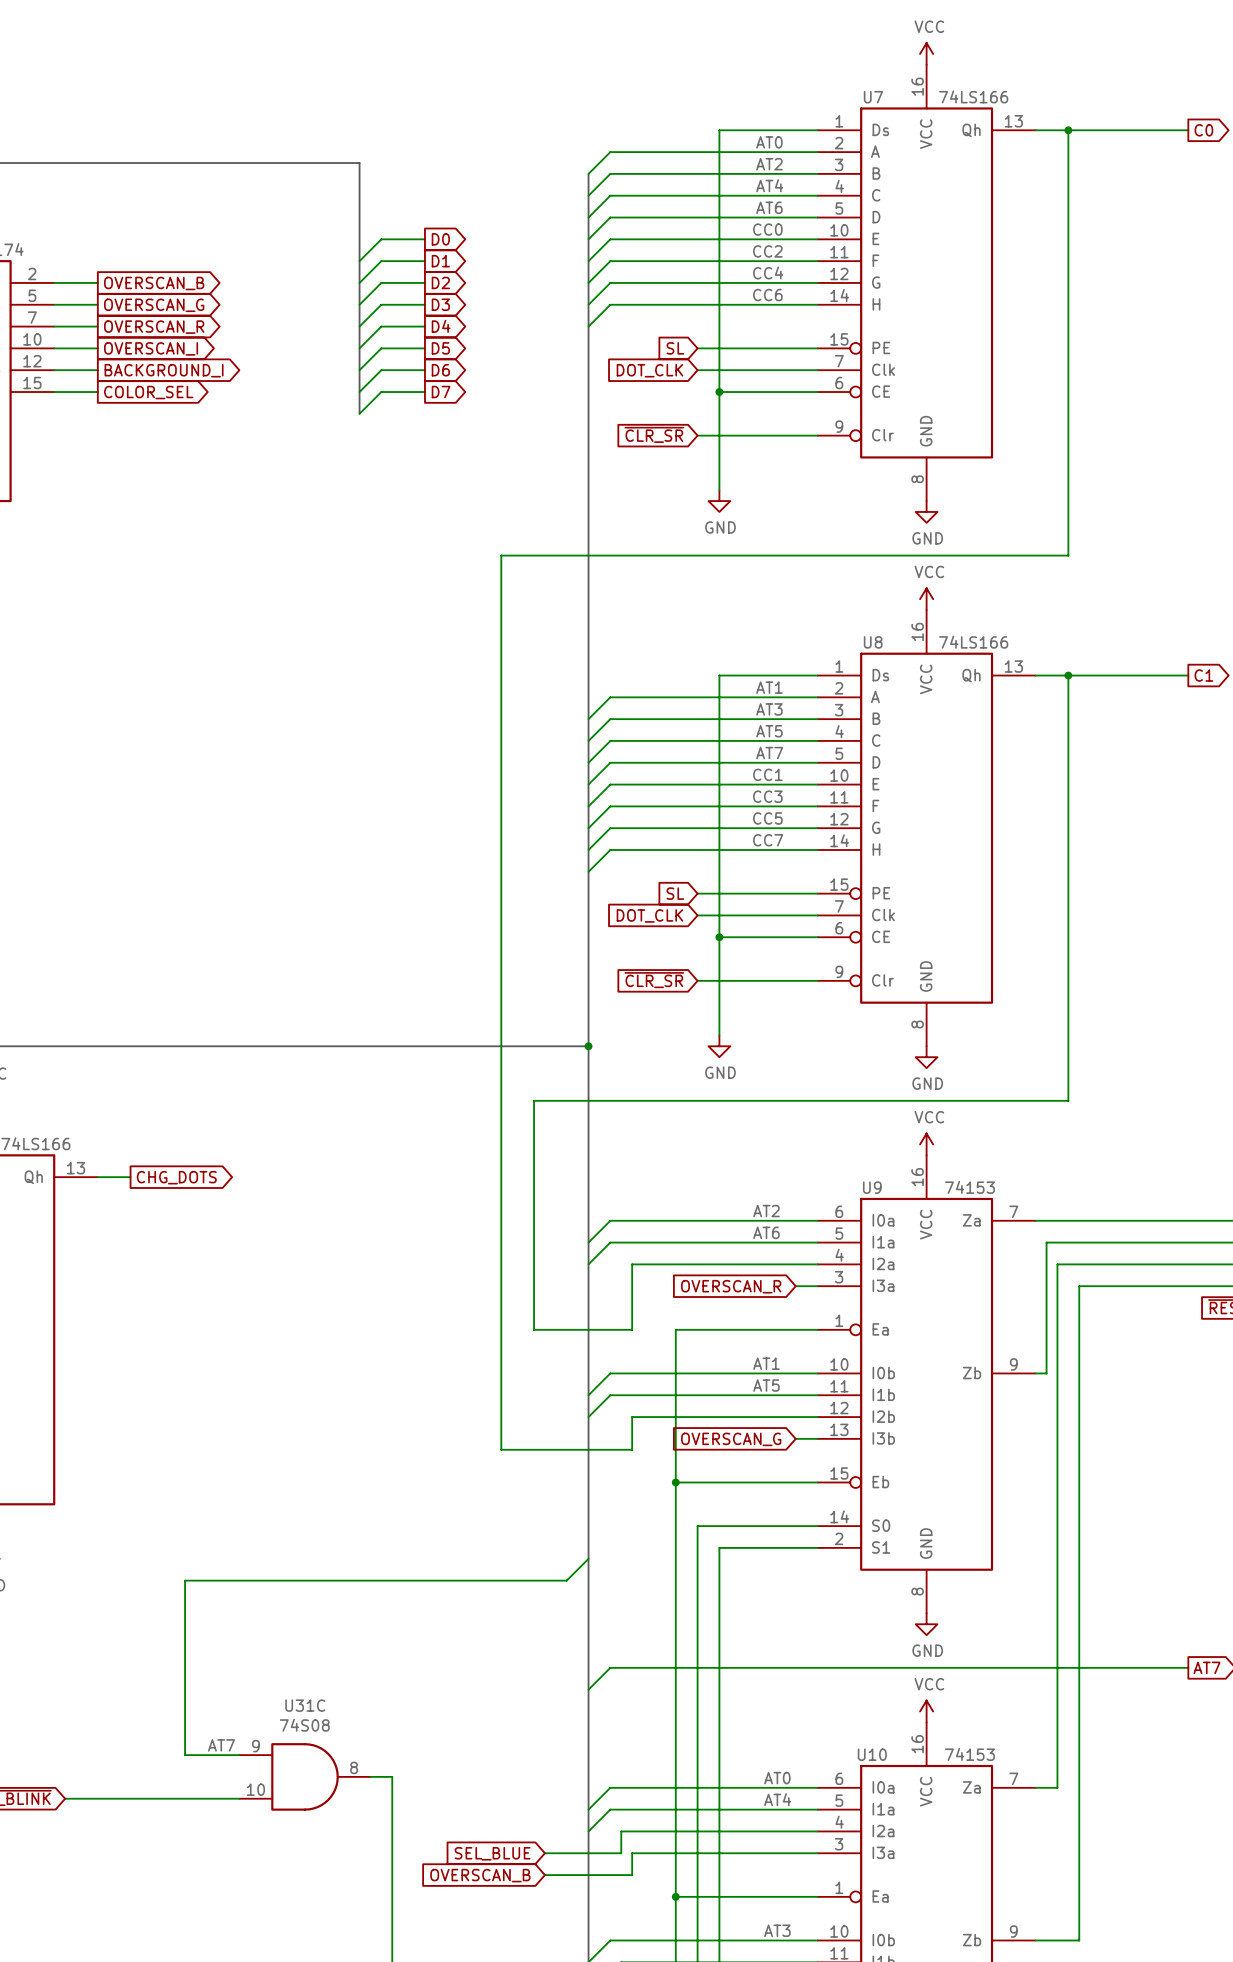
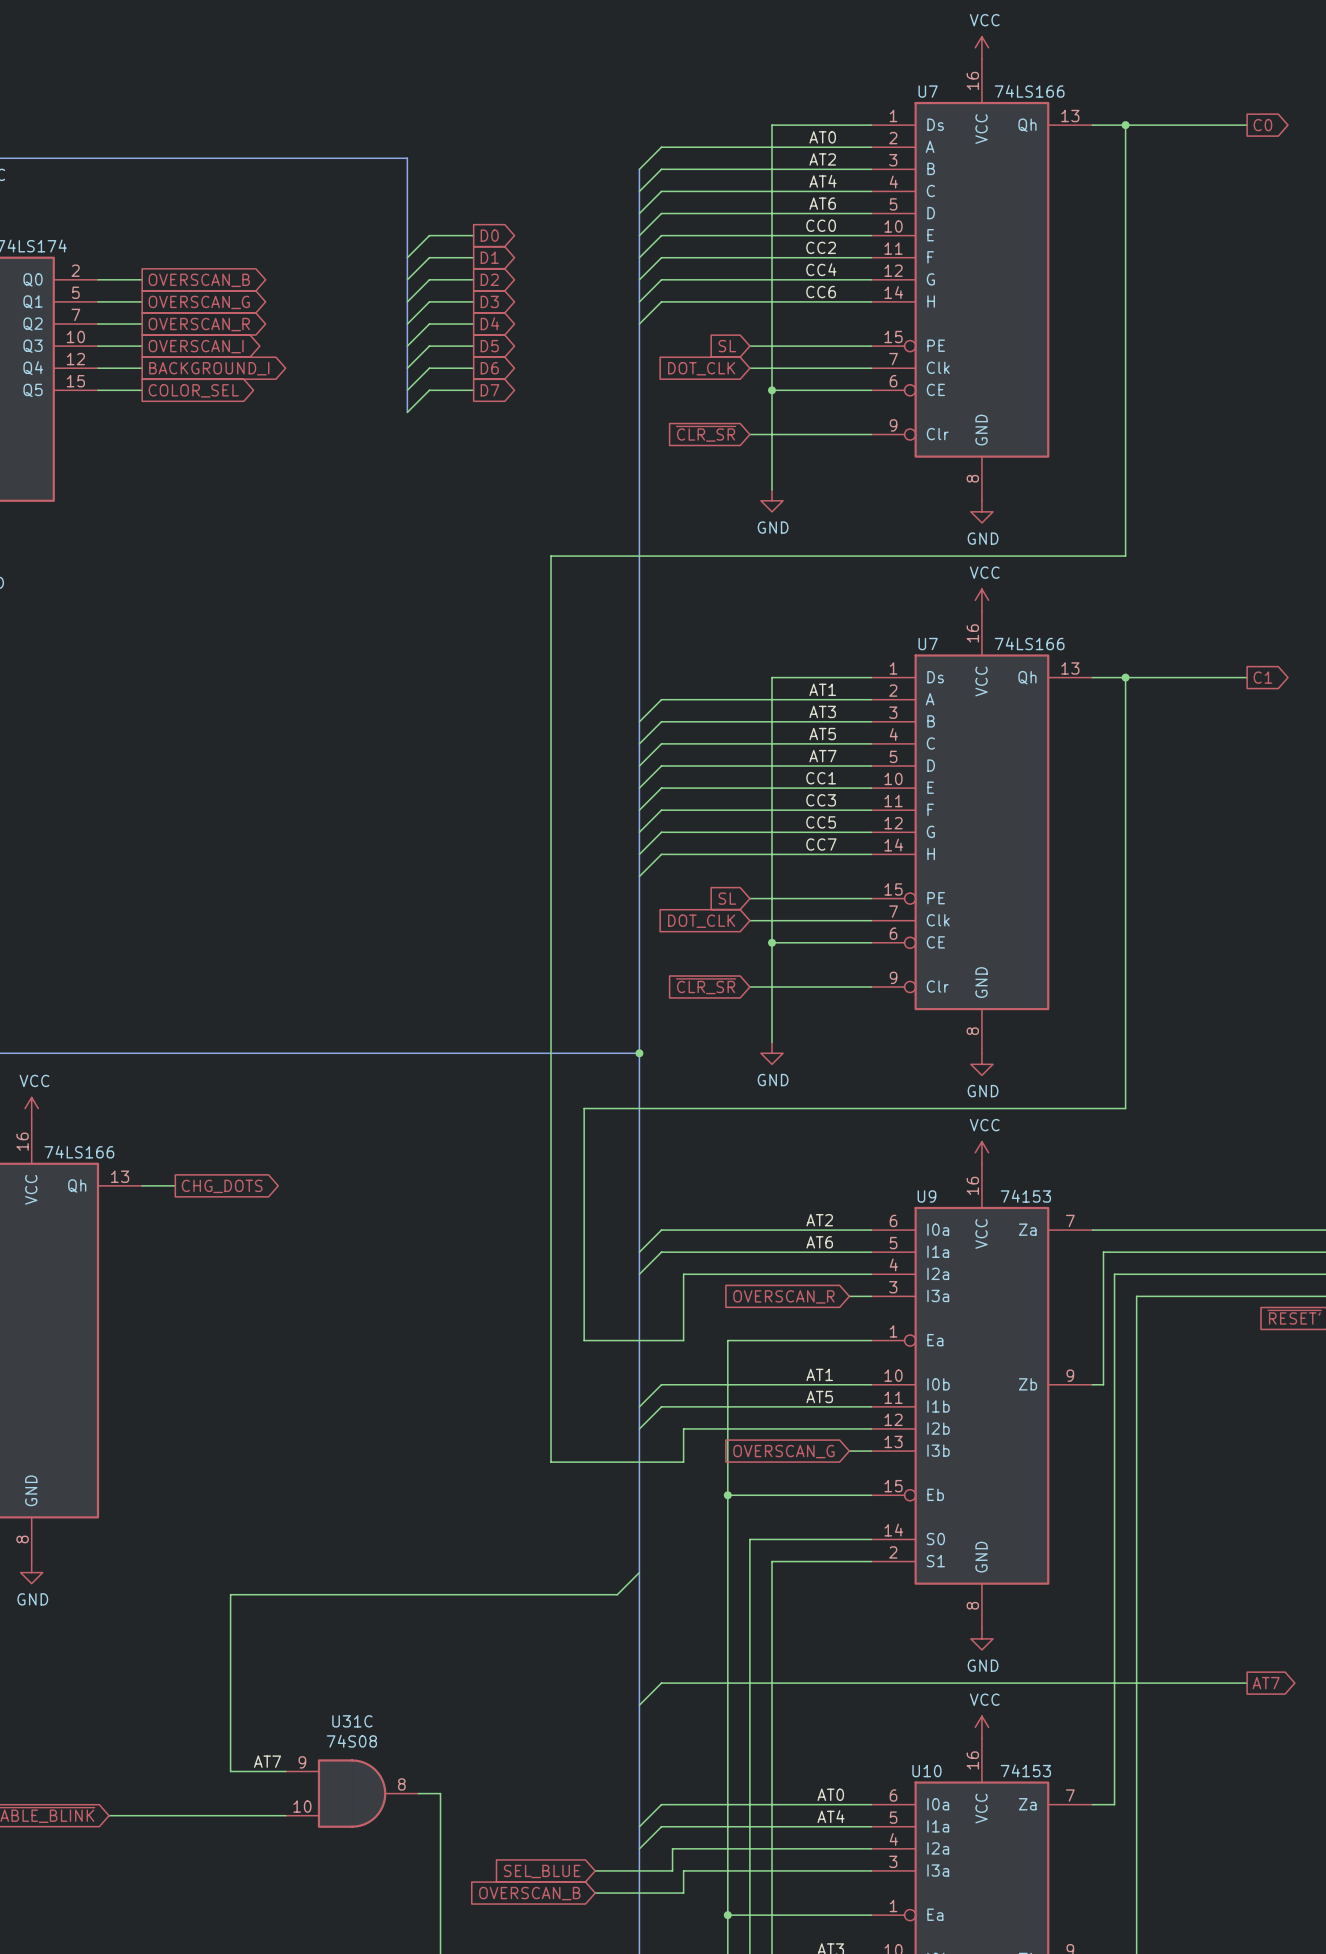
U8 name: U8 (873, 642) -> U7 (928, 644)

